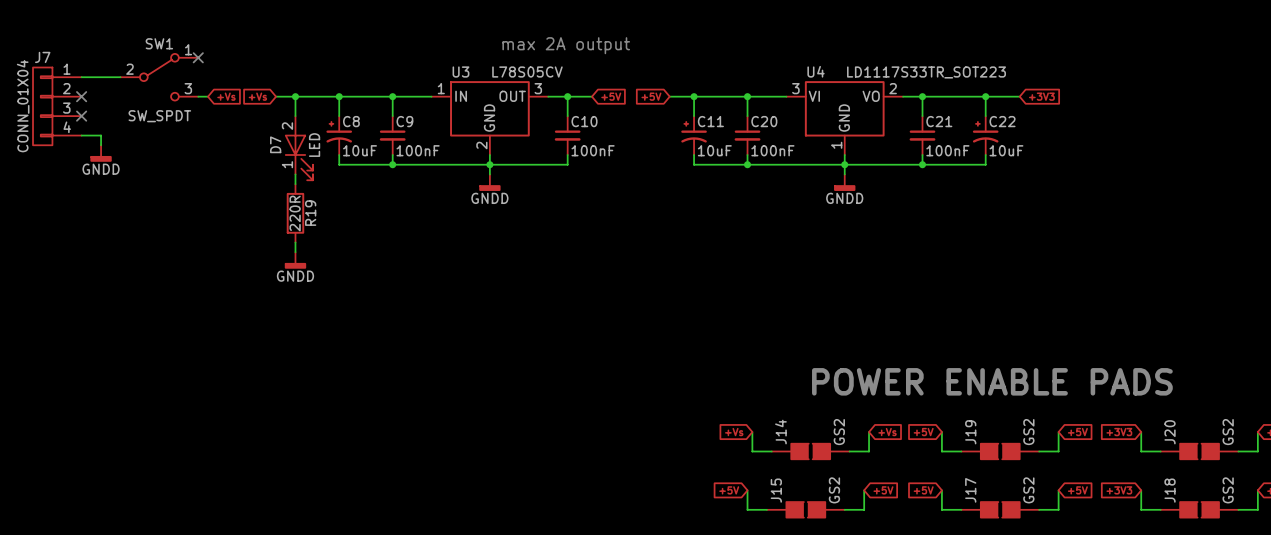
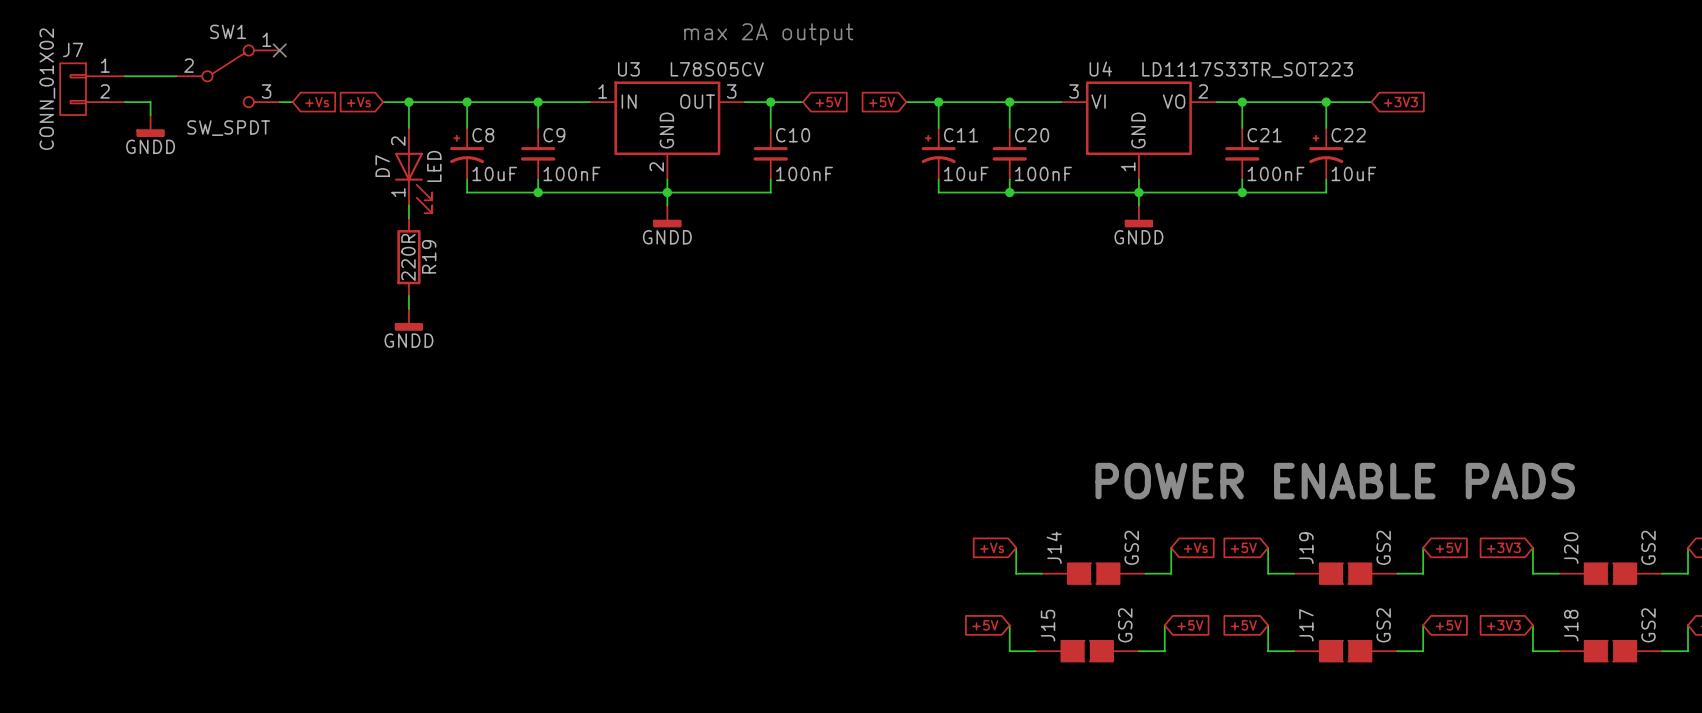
J7 symbol: [33, 67, 82, 146] -> [60, 63, 125, 116]
no-connect mark: (81, 96) -> none
J7 value: CONN_01X04 (23, 106) -> CONN_01X02 (47, 89)
no-connect mark: (81, 116) -> none
wire: (81, 135) (101, 135) (101, 145) -> (124, 102) (150, 102) (150, 115)
power symbol position: GNDD (101, 153) -> GNDD (150, 126)

